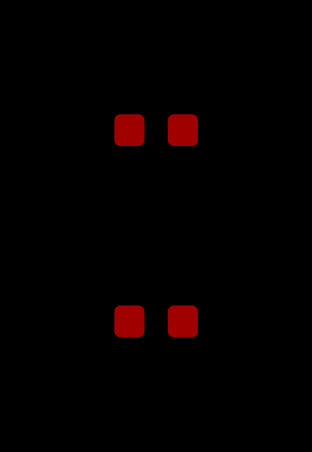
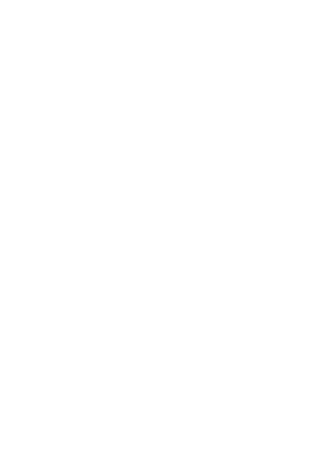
part: (156, 130) -> none
part: (156, 321) -> none

